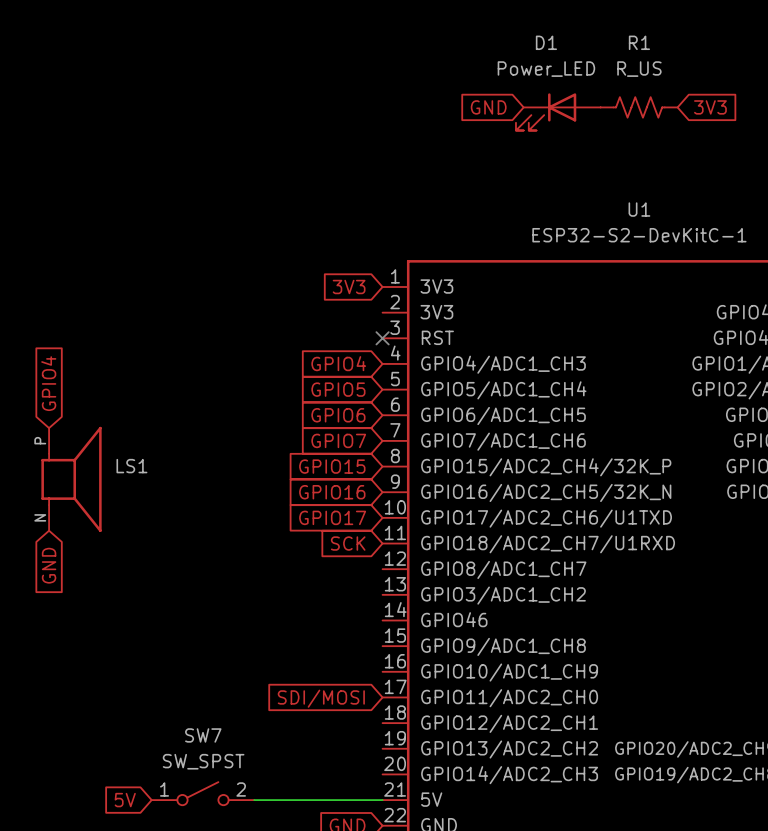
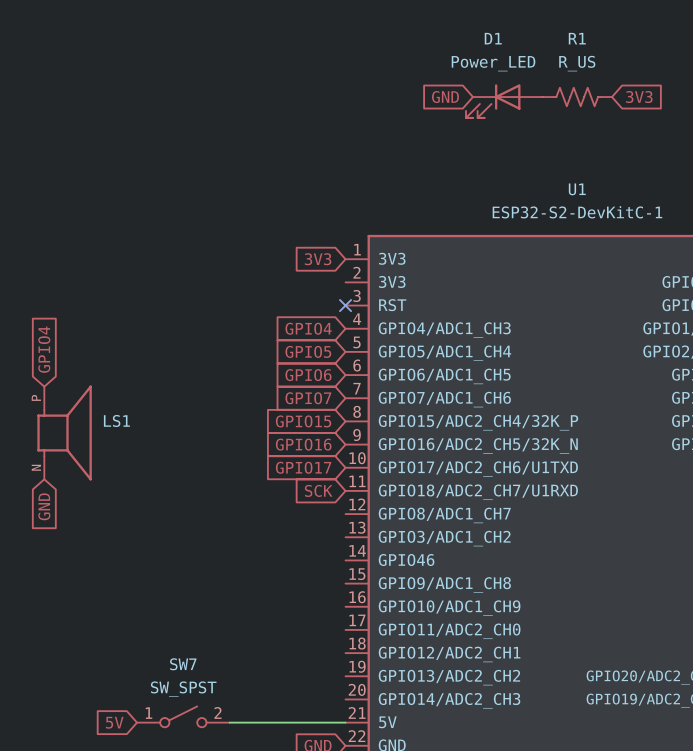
global label: SDI/MOSI (321, 698) -> none

